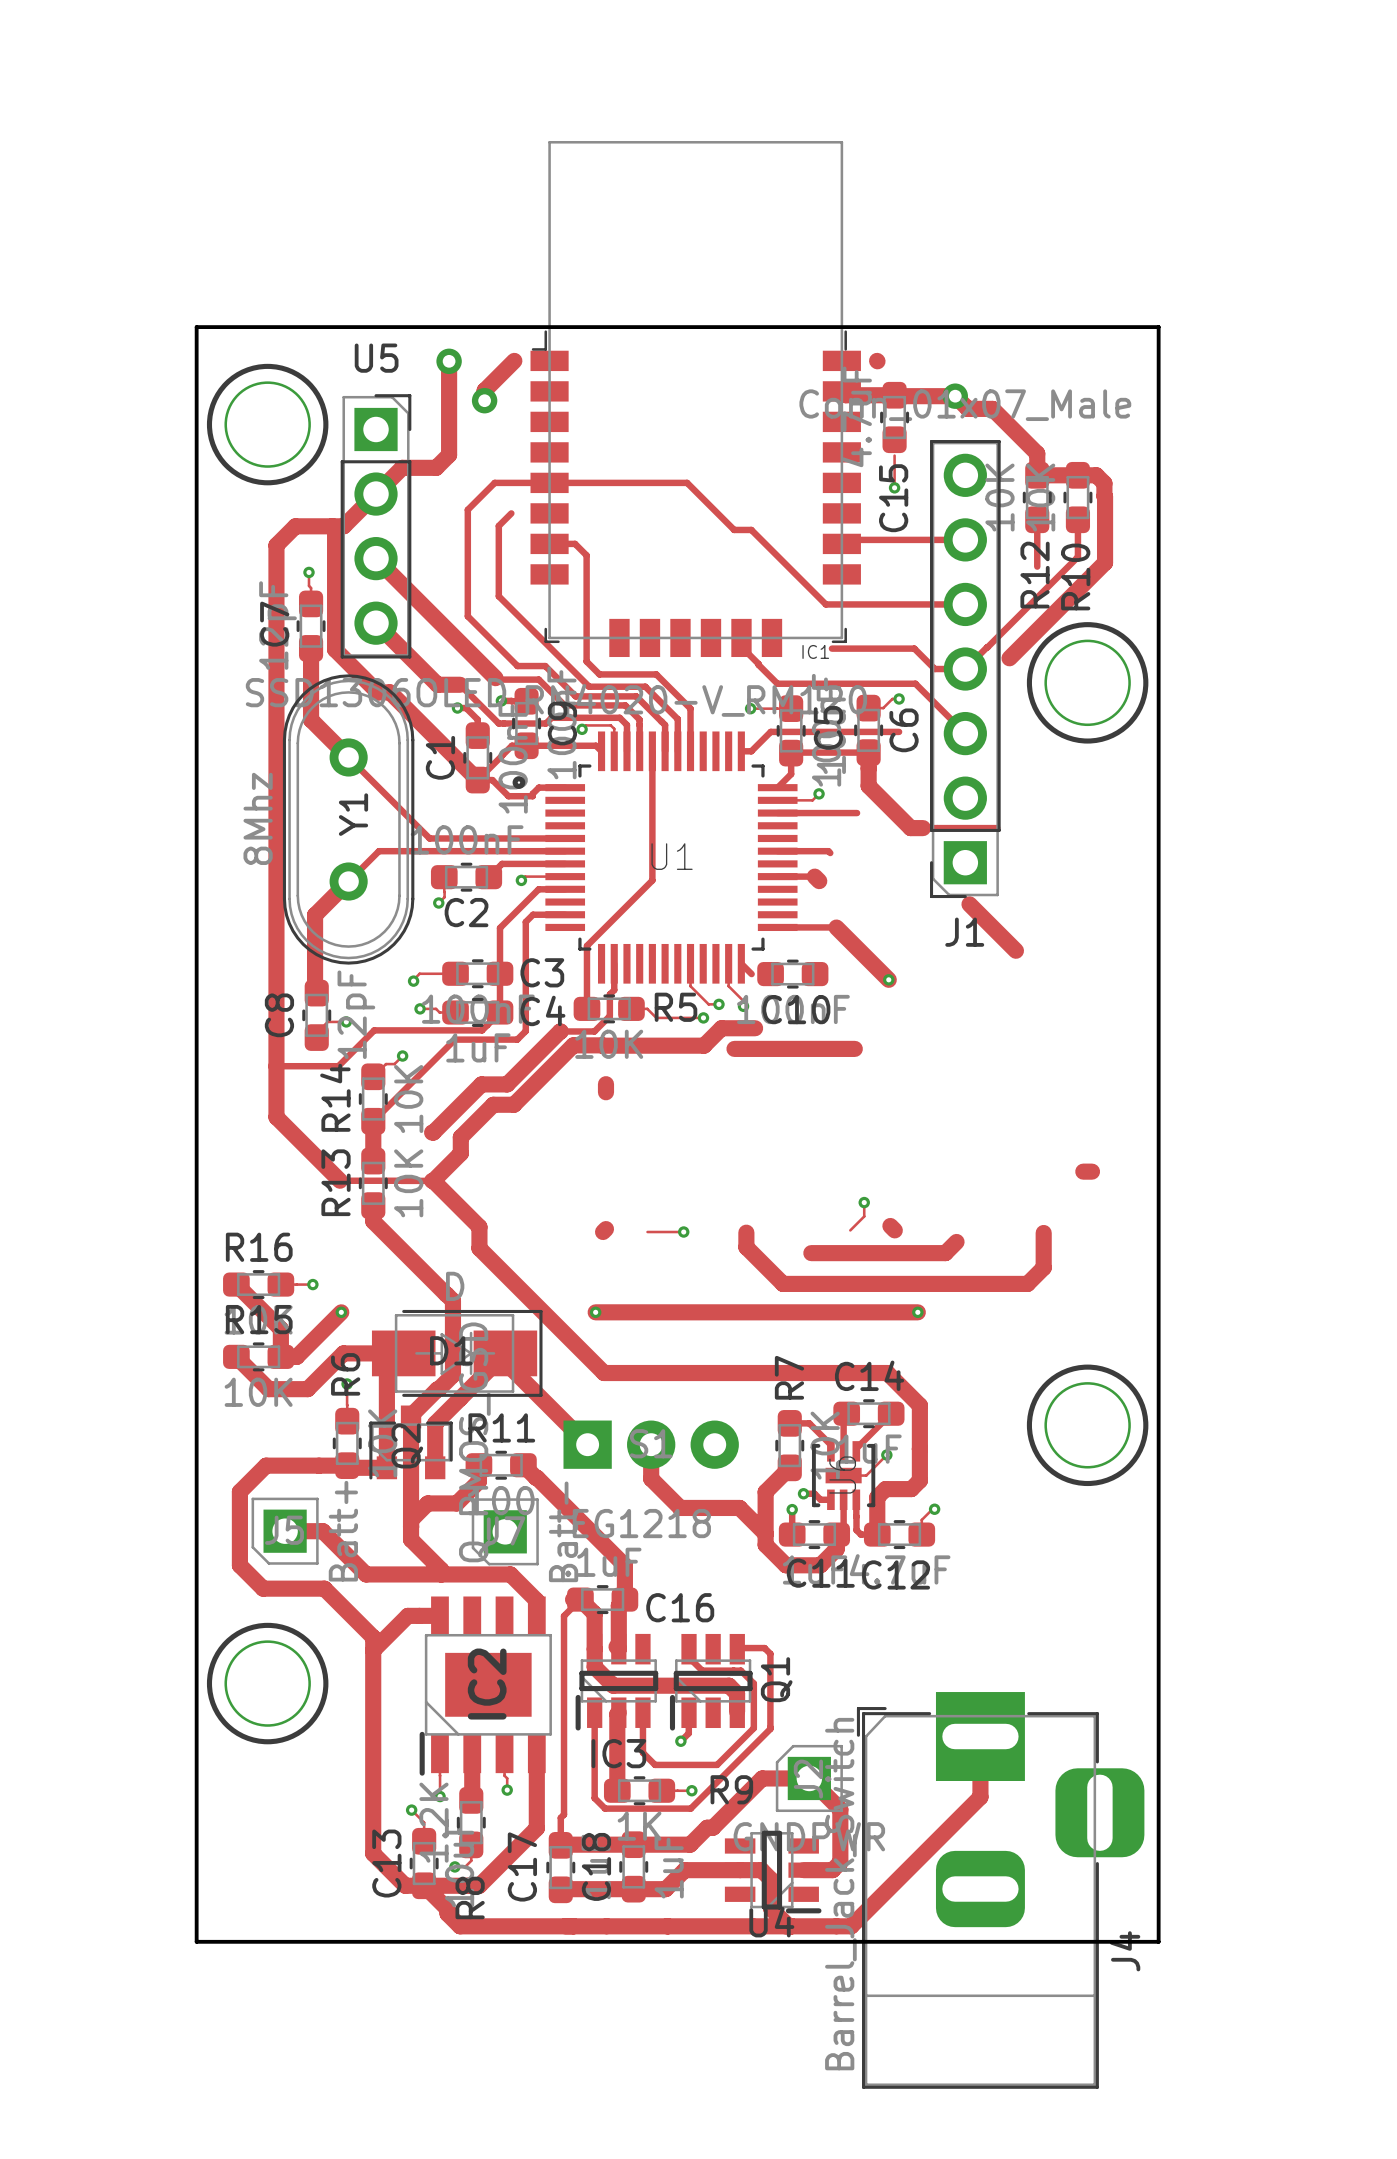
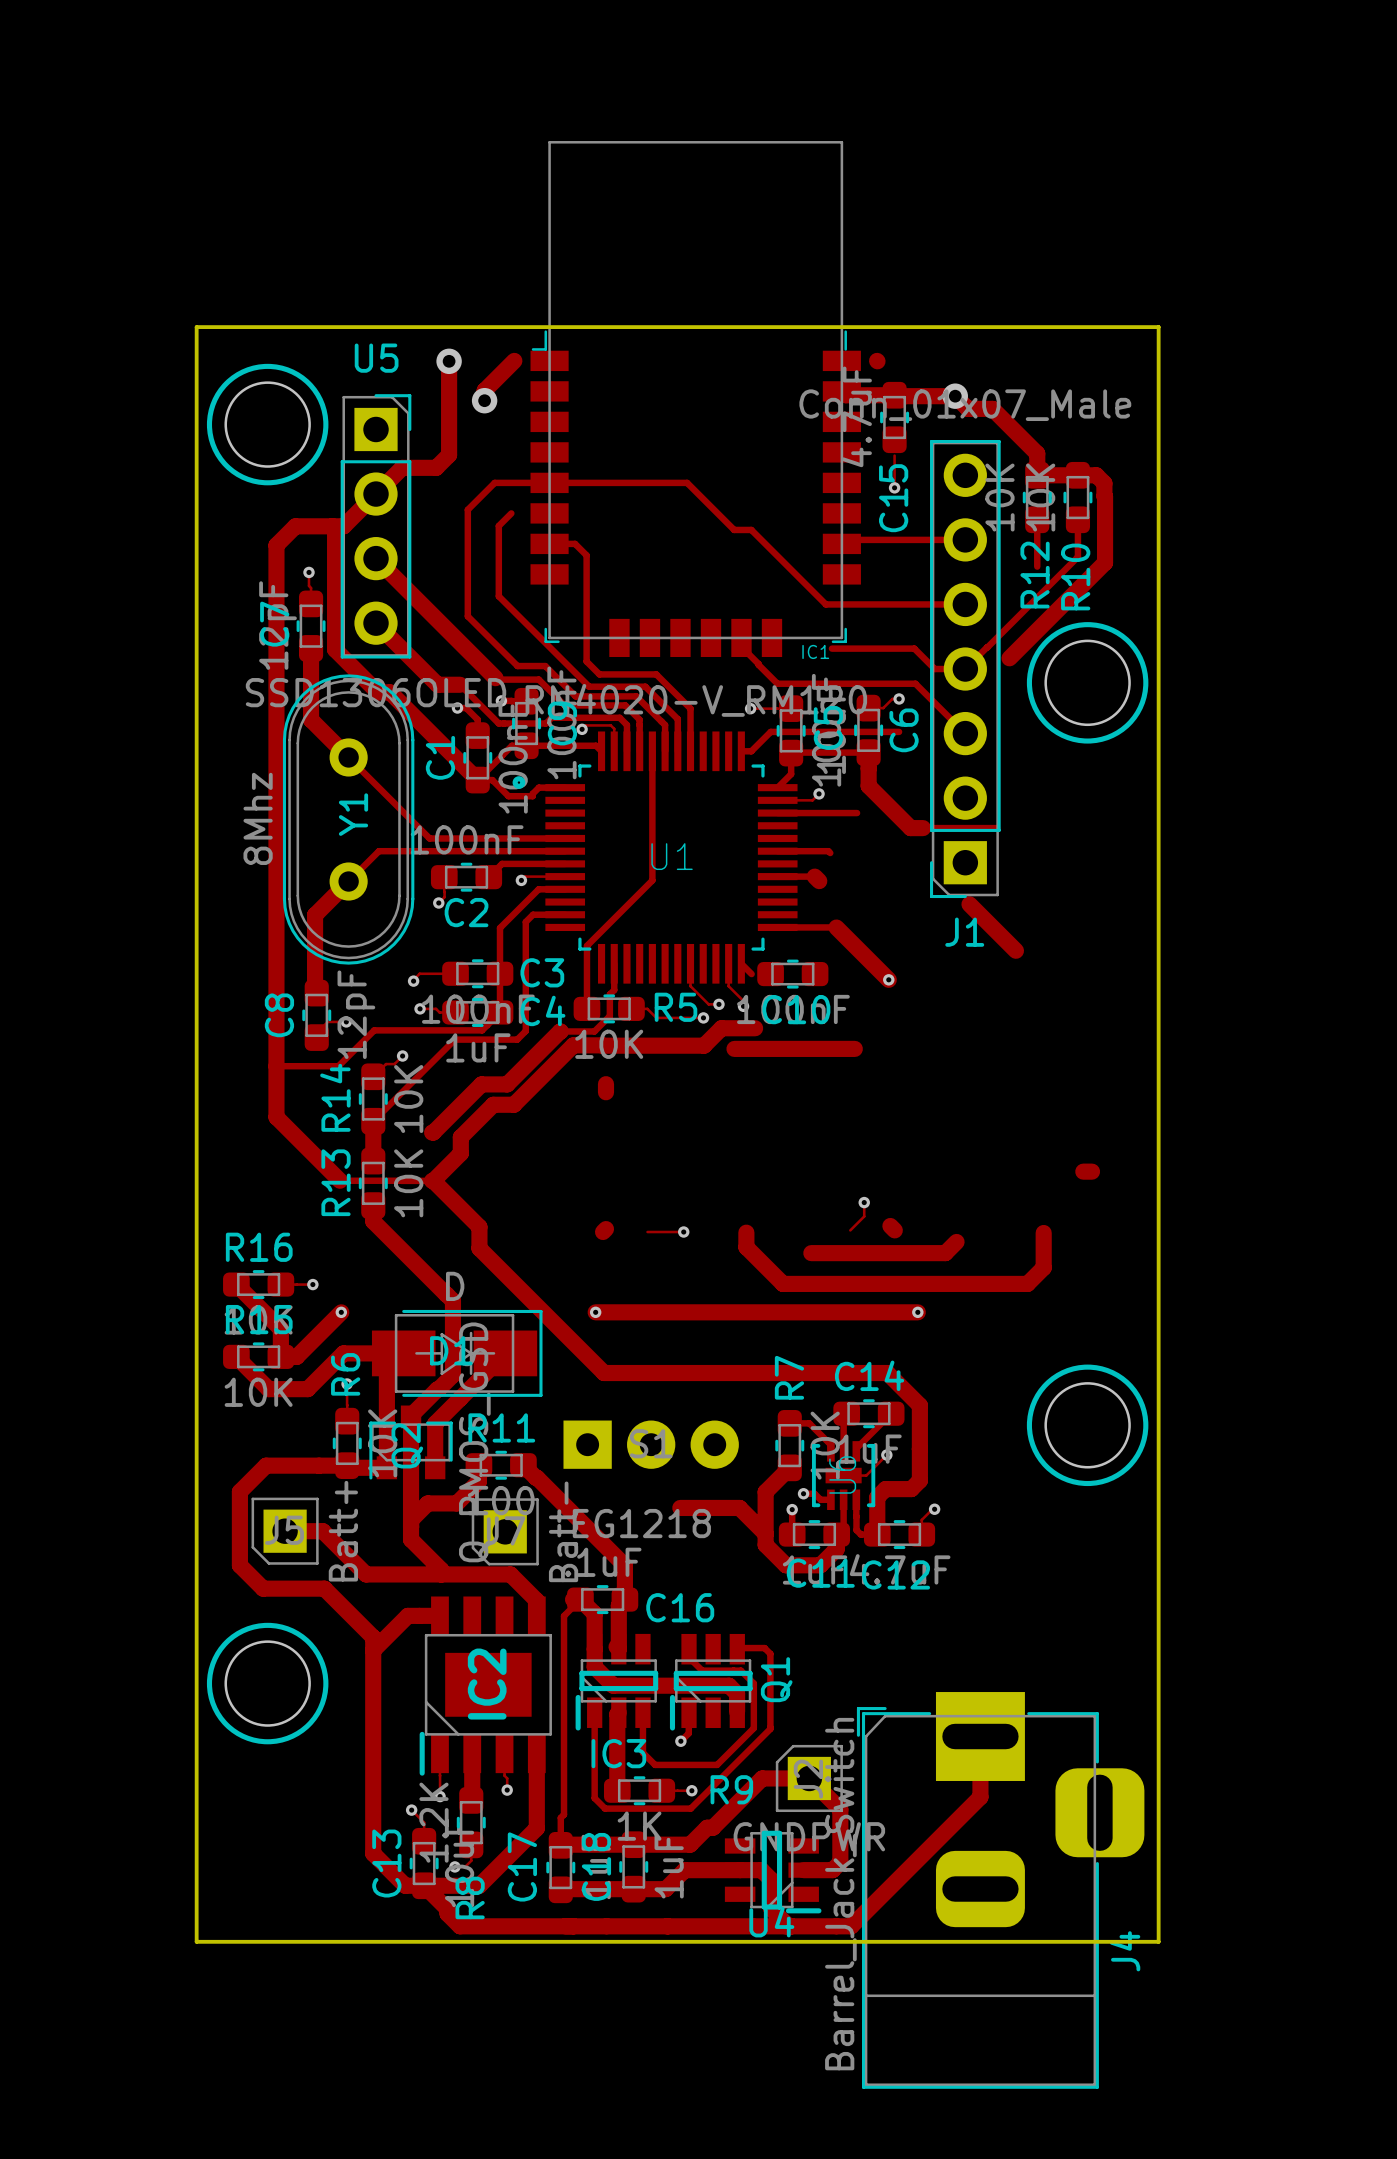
track: (505, 1362) (587, 1444) -> none
track: (651, 1444) (651, 1478) (680, 1507) -> none

